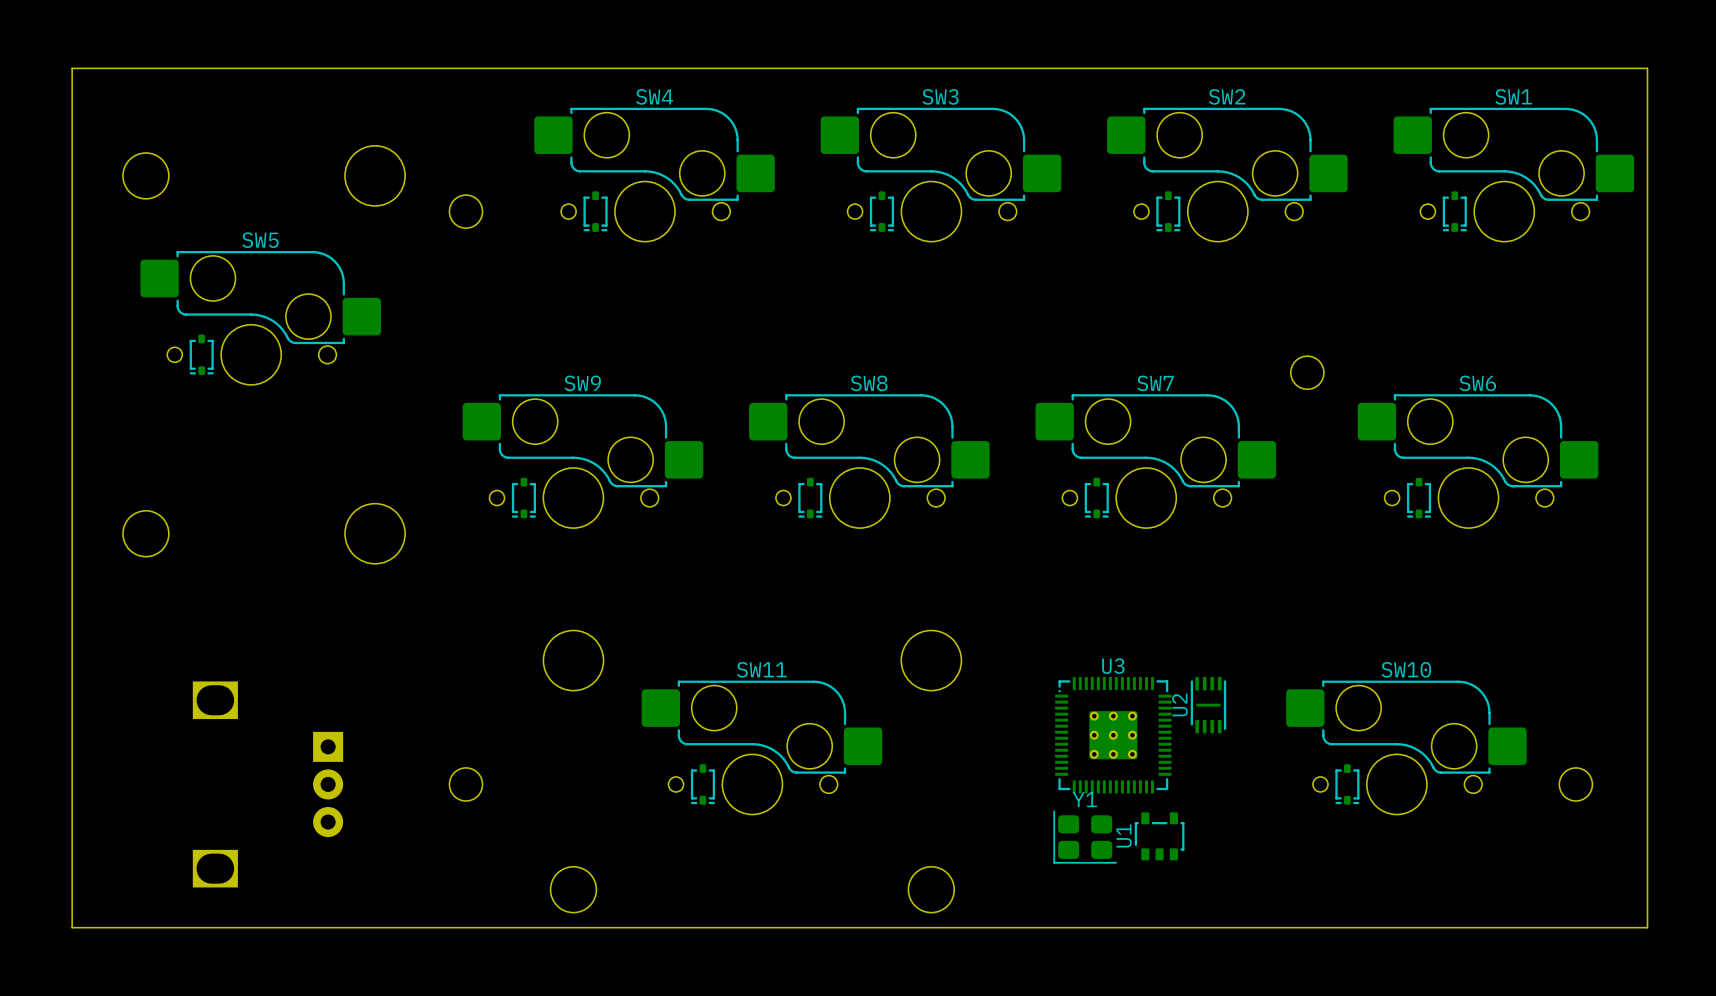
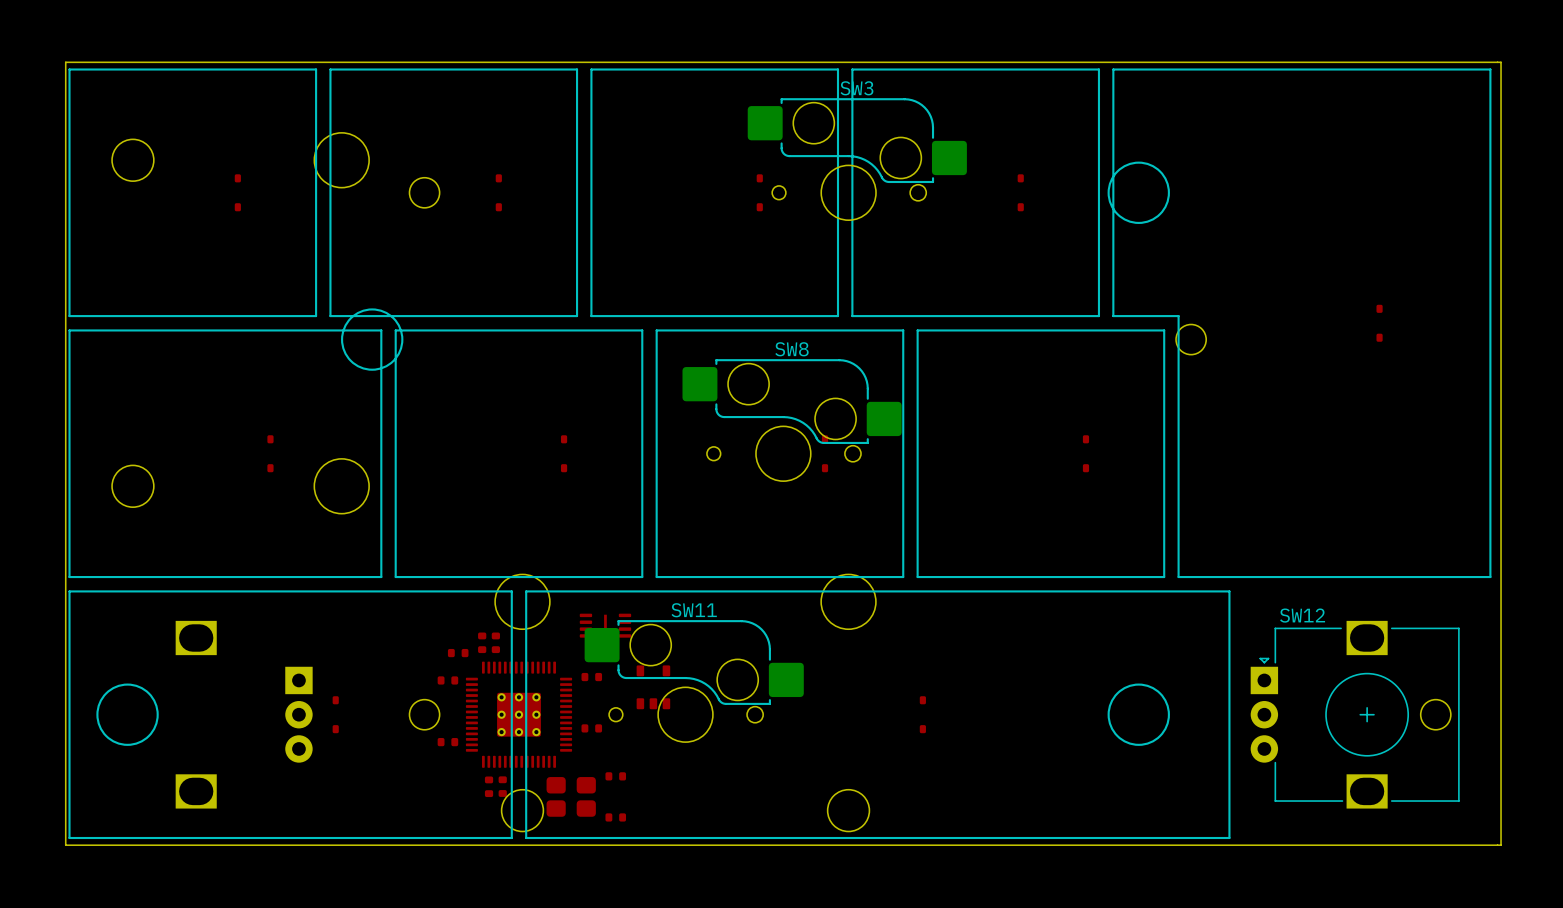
line: none -> (316, 69) (69, 69) (69, 316) (316, 316) (316, 69)
line: none -> (577, 69) (330, 69) (330, 316) (577, 316) (577, 69)
line: none -> (838, 69) (591, 69) (591, 316) (838, 316) (838, 69)
line: none -> (1098, 69) (852, 69) (852, 316) (1098, 316) (1098, 69)
line: none -> (1490, 69) (1490, 577) (1178, 577) (1178, 316) (1113, 316) (1113, 69) (1490, 69)
SW4: (654, 174) -> none
SW2: (1227, 174) -> none
SW1: (1513, 174) -> none
drawing: none -> [1107, 161, 1170, 224]
part: none -> (237, 192)
part: none -> (498, 192)
part: (595, 211) -> none
part side: bottom (881, 211) -> top (759, 192)
part: none -> (1020, 192)
part: (1168, 211) -> none
part: (1454, 211) -> none
SW5: (260, 318) -> none
drawing: none -> [341, 308, 404, 371]
part: (201, 354) -> none
part: none -> (1379, 323)
line: none -> (381, 330) (69, 330) (69, 577) (381, 577) (381, 330)
line: none -> (642, 330) (395, 330) (395, 577) (642, 577) (642, 330)
line: none -> (903, 330) (656, 330) (656, 577) (903, 577) (903, 330)
line: none -> (1164, 330) (917, 330) (917, 577) (1164, 577) (1164, 330)
SW9: (582, 461) -> none
SW7: (1155, 461) -> none
SW6: (1478, 461) -> none
part: none -> (270, 453)
part: (523, 498) -> none
part: none -> (564, 453)
part side: bottom (810, 498) -> top (825, 453)
part: (1096, 498) -> none
part: none -> (1085, 453)
part: (1419, 498) -> none
line: none -> (511, 591) (69, 591) (69, 838) (511, 838) (511, 591)
line: none -> (1229, 591) (526, 591) (526, 838) (1229, 838) (1229, 591)
part: none -> (605, 625)
part: none -> (482, 642)
part: none -> (495, 642)
U2: (1208, 705) -> none
part: none -> (458, 653)
U3: (1113, 735) -> none
part: none -> (591, 677)
part: none -> (447, 680)
SW10: (1406, 747) -> none
drawing: none -> [96, 683, 159, 746]
drawing: none -> [1107, 683, 1170, 746]
part: none -> (653, 687)
part: none -> (335, 714)
part: none -> (518, 714)
part side: bottom (702, 784) -> top (922, 714)
part: (1347, 784) -> none
SW12: none -> (1355, 714)
part: none -> (591, 728)
part: none -> (447, 742)
U1: (1159, 836) -> none
Y1: (1085, 837) -> none
part: none -> (615, 776)
part: none -> (489, 786)
part: none -> (502, 786)
part: none -> (571, 796)
part: none -> (615, 817)

